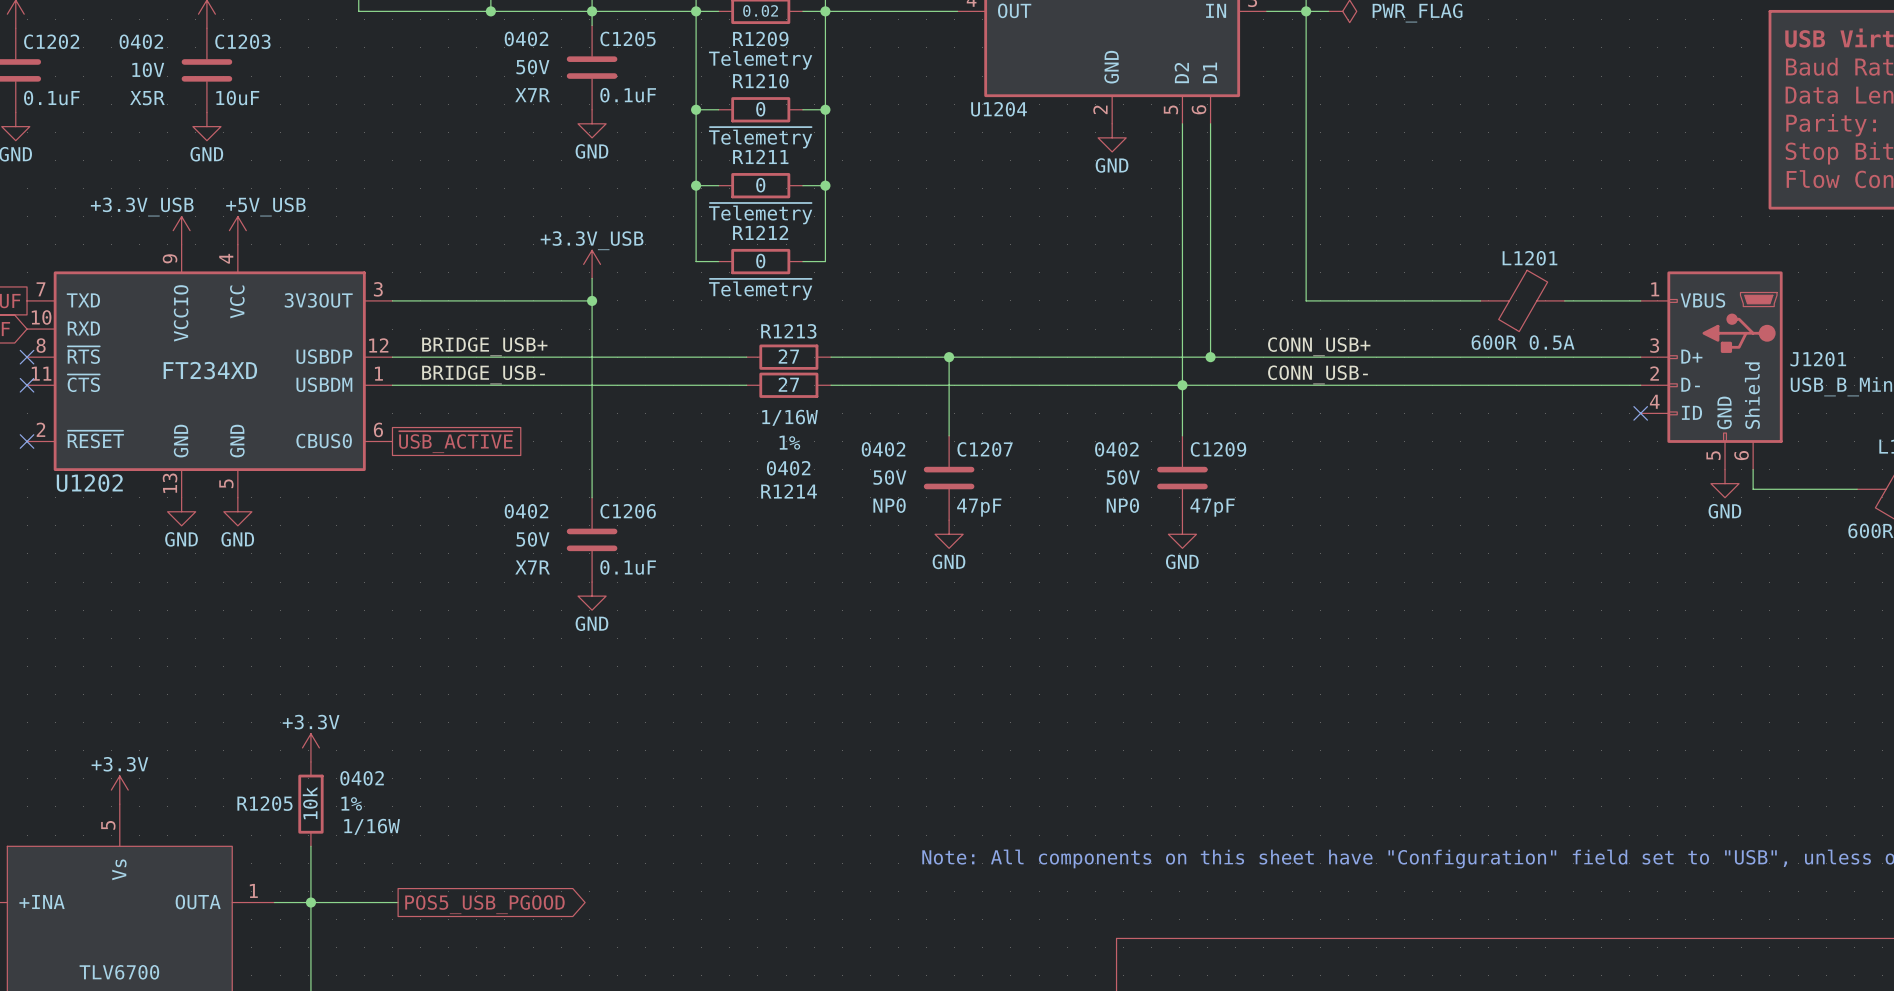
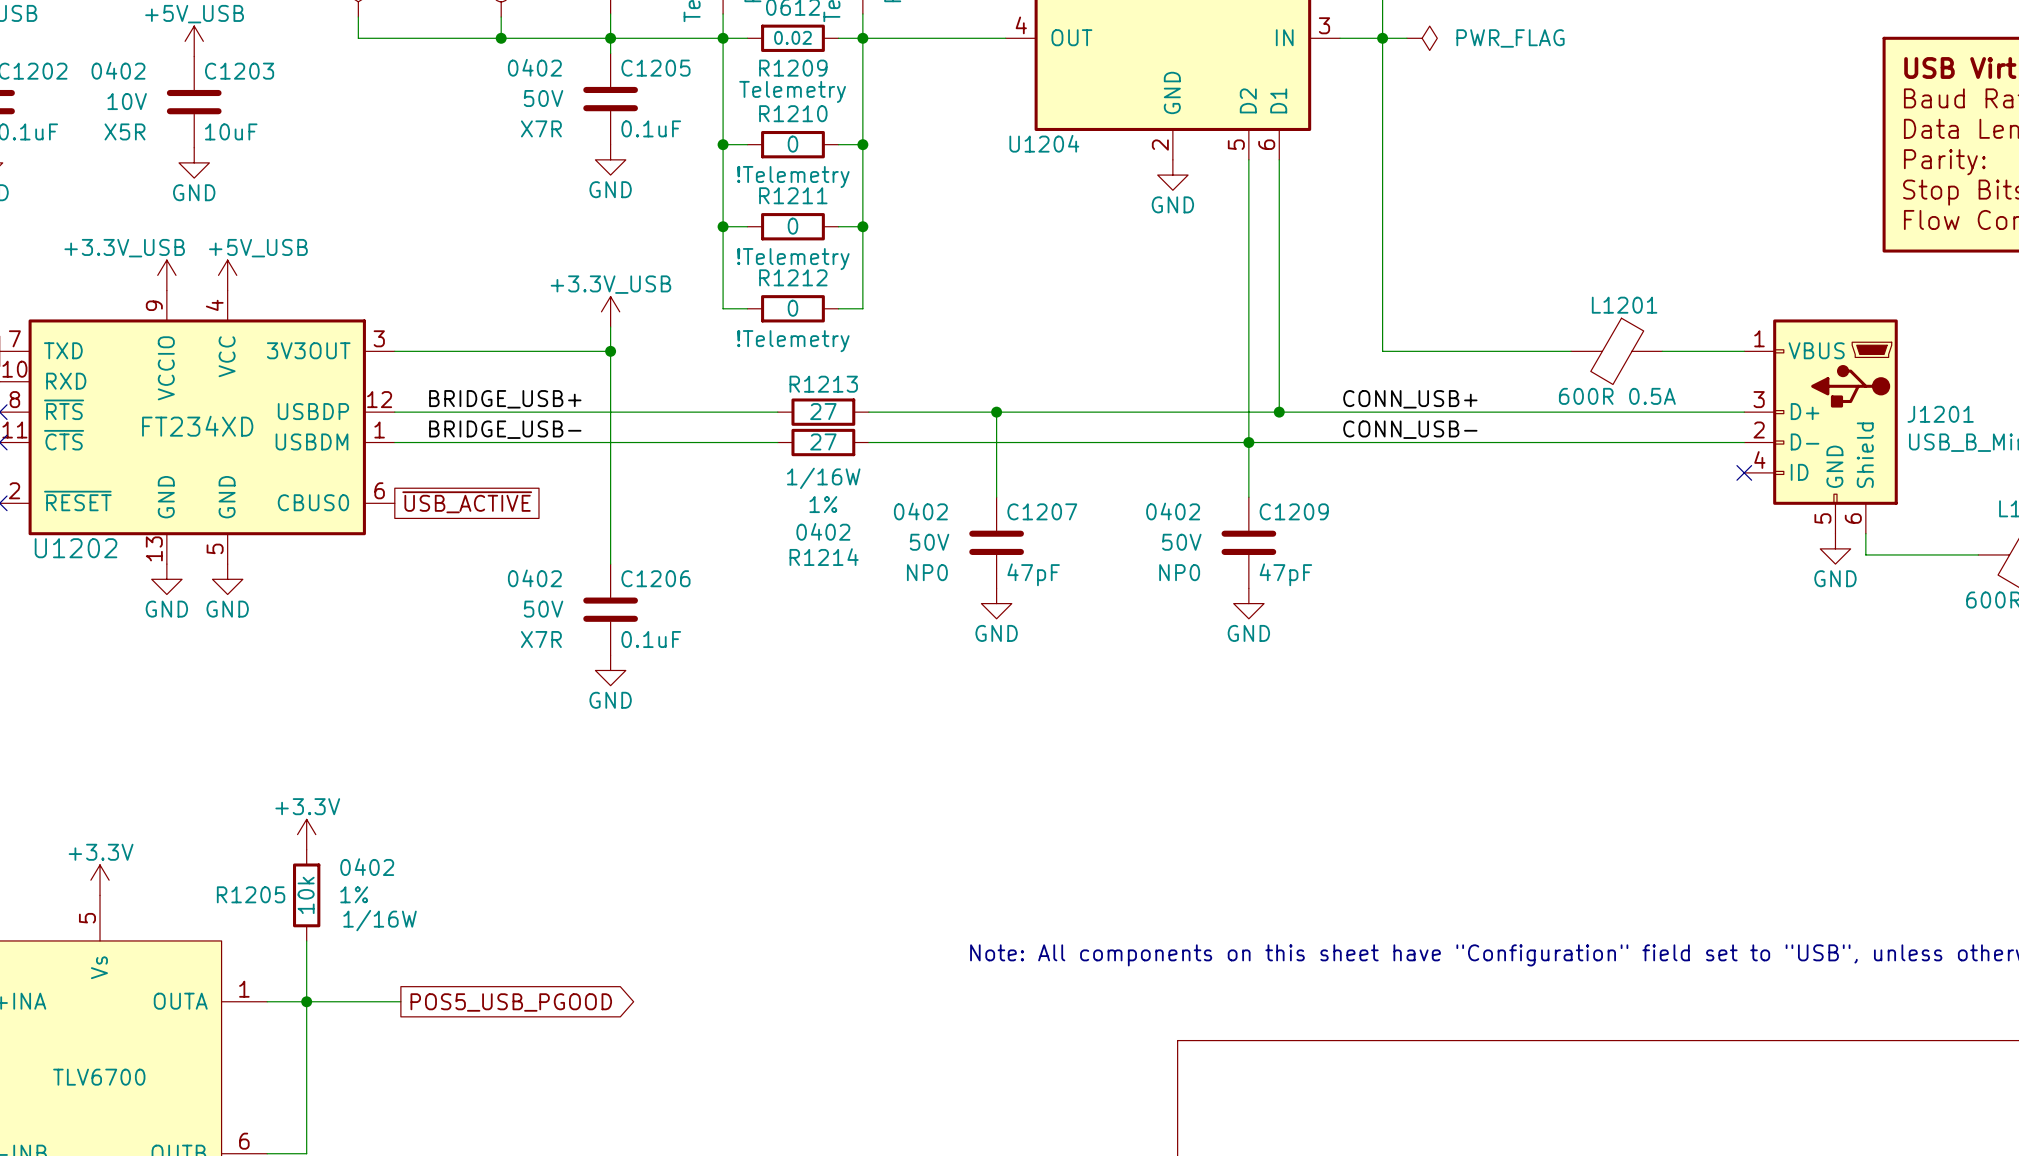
R1210 text: ~{Telemetry} (760, 137) -> !Telemetry (793, 177)
R1211 text: ~{Telemetry} (760, 213) -> !Telemetry (793, 259)
R1212 text: ~{Telemetry} (760, 289) -> !Telemetry (793, 341)

